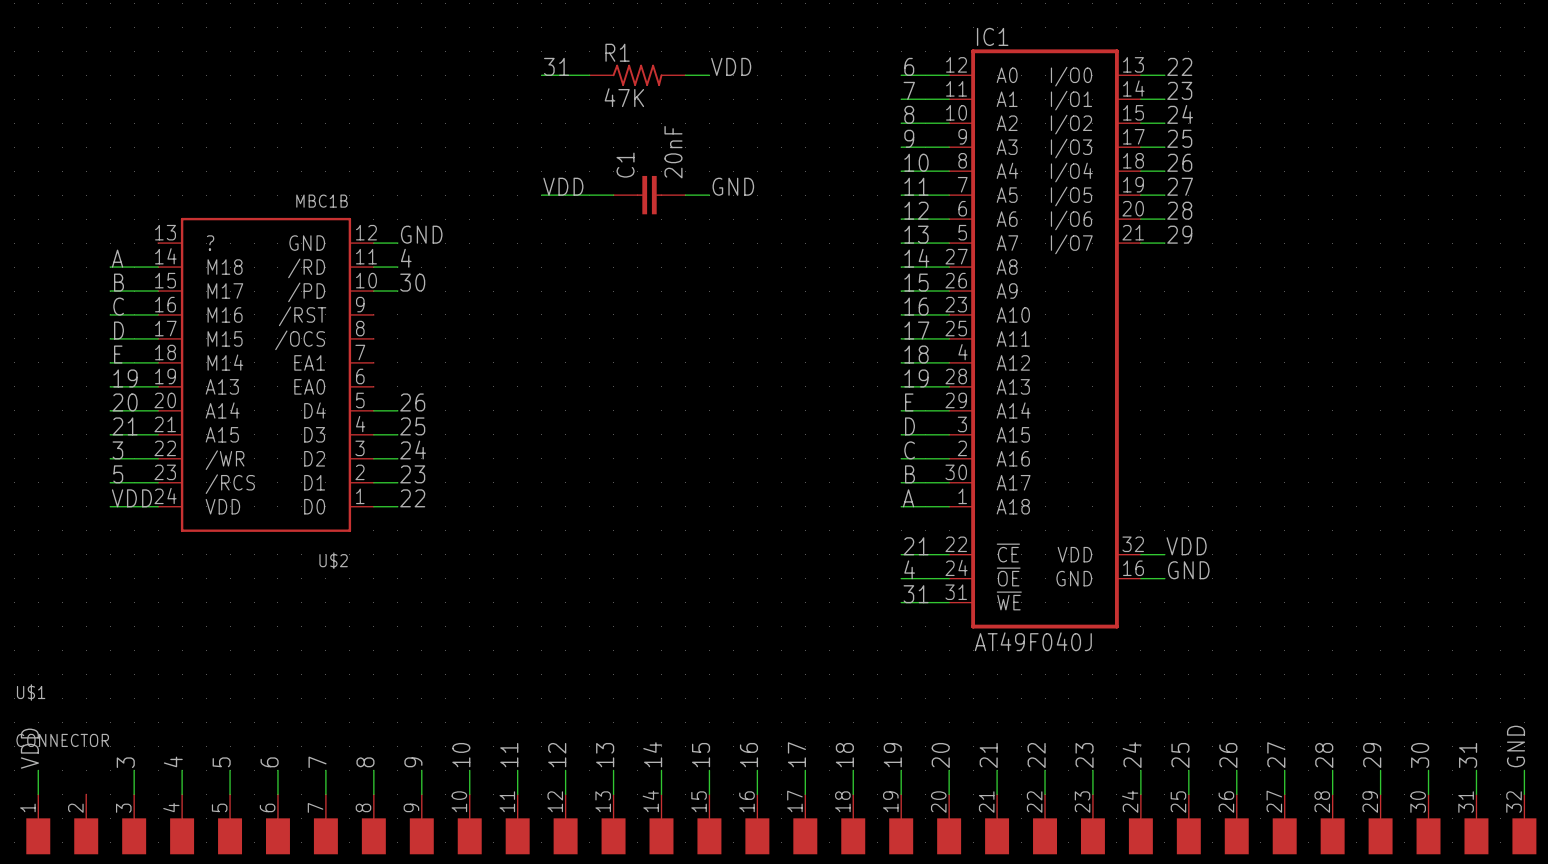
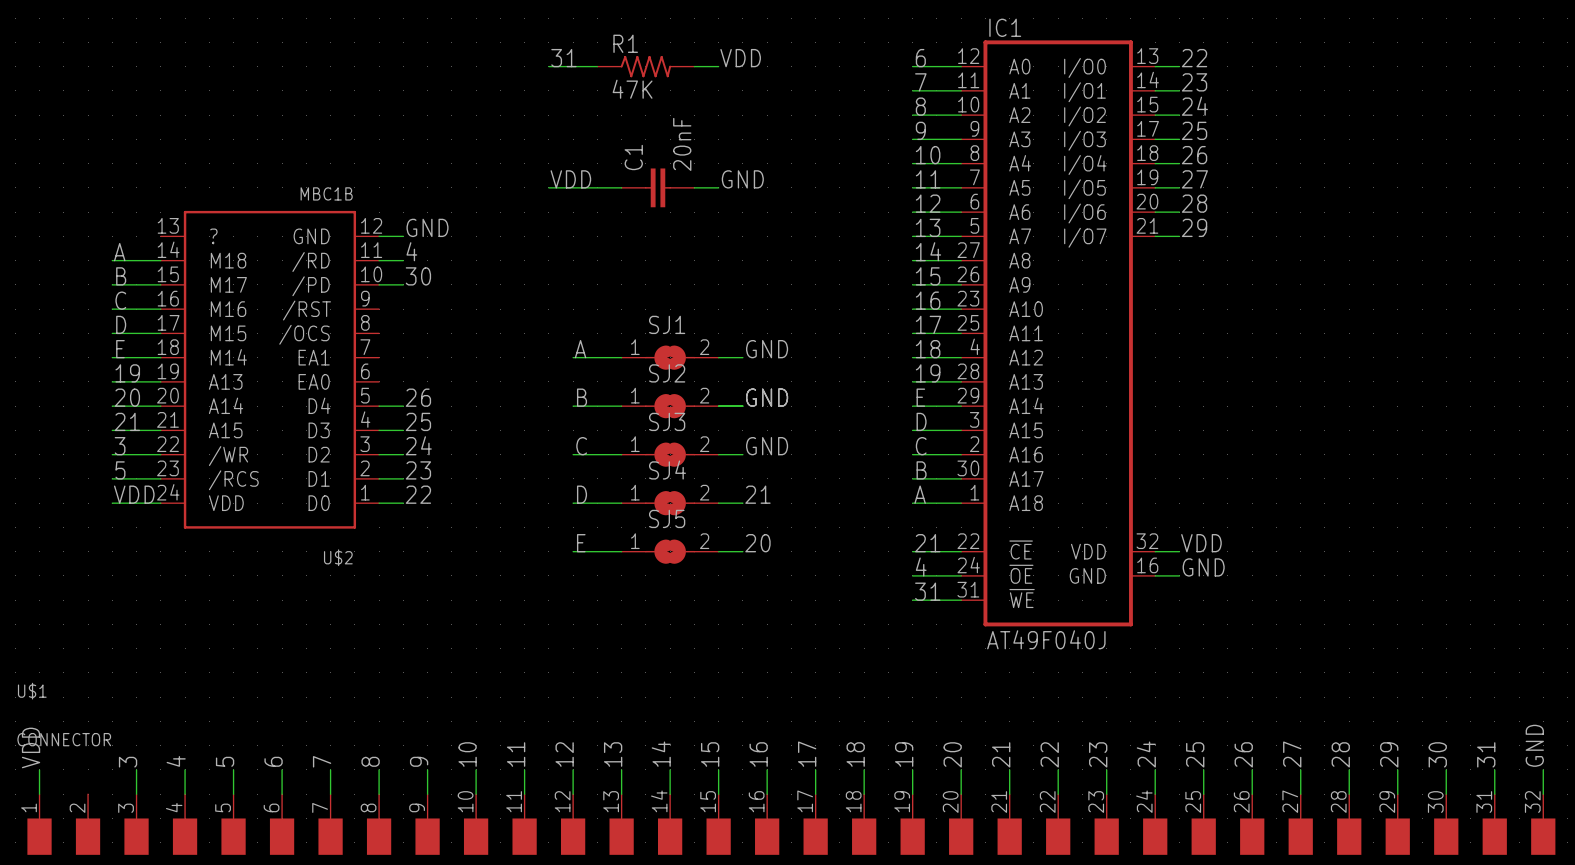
label: none -> A (580, 349)
label: none -> GND (767, 349)
wire: none -> (573, 357) (621, 357)
SJ1: none -> (670, 357)
wire: none -> (718, 357) (742, 357)
label: none -> B (582, 397)
label: none -> GND (767, 397)
wire: none -> (573, 406) (621, 406)
SJ2: none -> (670, 406)
wire: none -> (718, 406) (742, 406)
label: none -> C (581, 446)
label: none -> GND (767, 446)
wire: none -> (573, 454) (621, 454)
SJ3: none -> (670, 454)
wire: none -> (718, 454) (742, 454)
label: none -> D (582, 494)
label: none -> 21 (757, 494)
wire: none -> (573, 503) (621, 503)
SJ4: none -> (670, 503)
wire: none -> (718, 503) (742, 503)
label: none -> E (581, 543)
label: none -> 20 (757, 543)
wire: none -> (573, 551) (621, 551)
SJ5: none -> (670, 551)
wire: none -> (718, 551) (742, 551)

